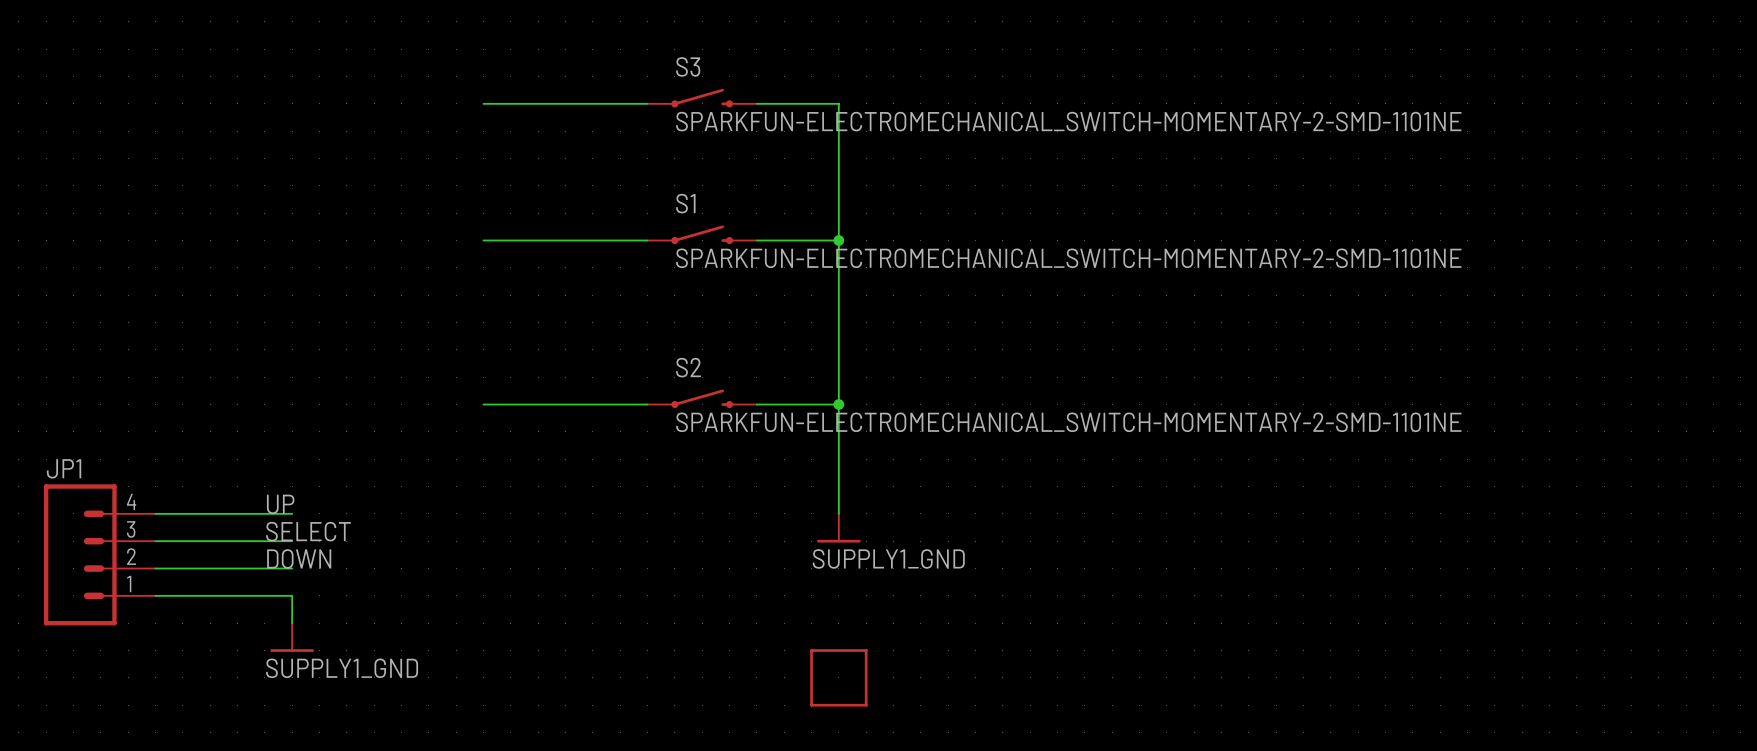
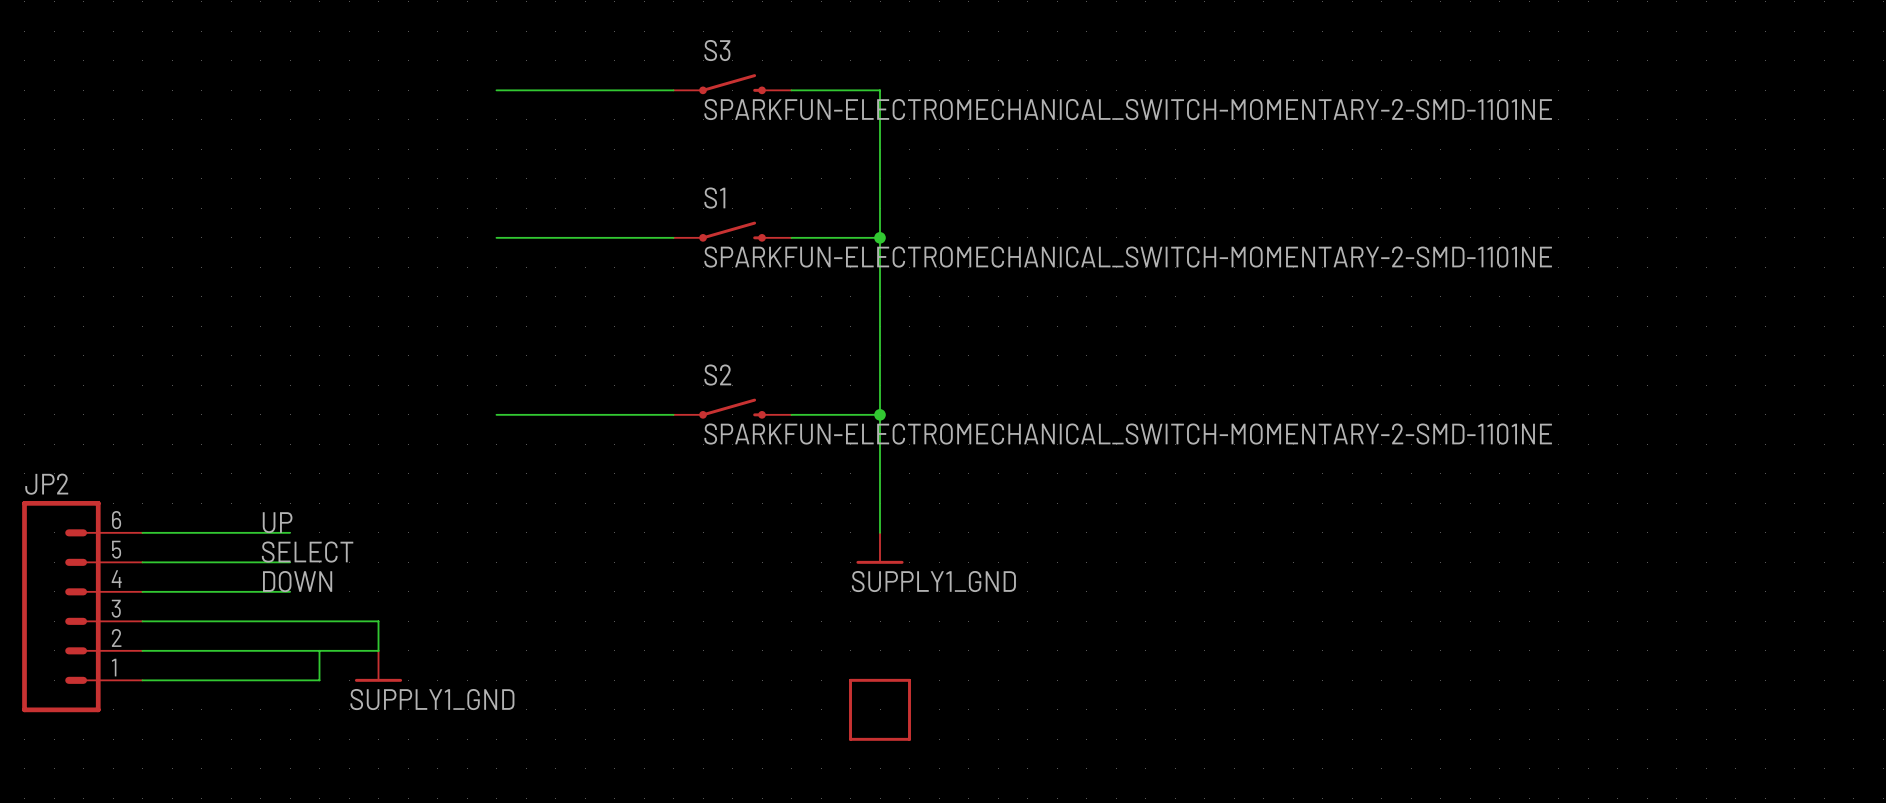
JP1: (99, 554) -> none
JP2: none -> (82, 606)
wire: (292, 595) (292, 623) -> (290, 621) (378, 621) (378, 650) (142, 650)
wire: none -> (319, 650) (319, 680) (142, 680)
power symbol position: SUPPLY1_GND (292, 637) -> SUPPLY1_GND (378, 666)

